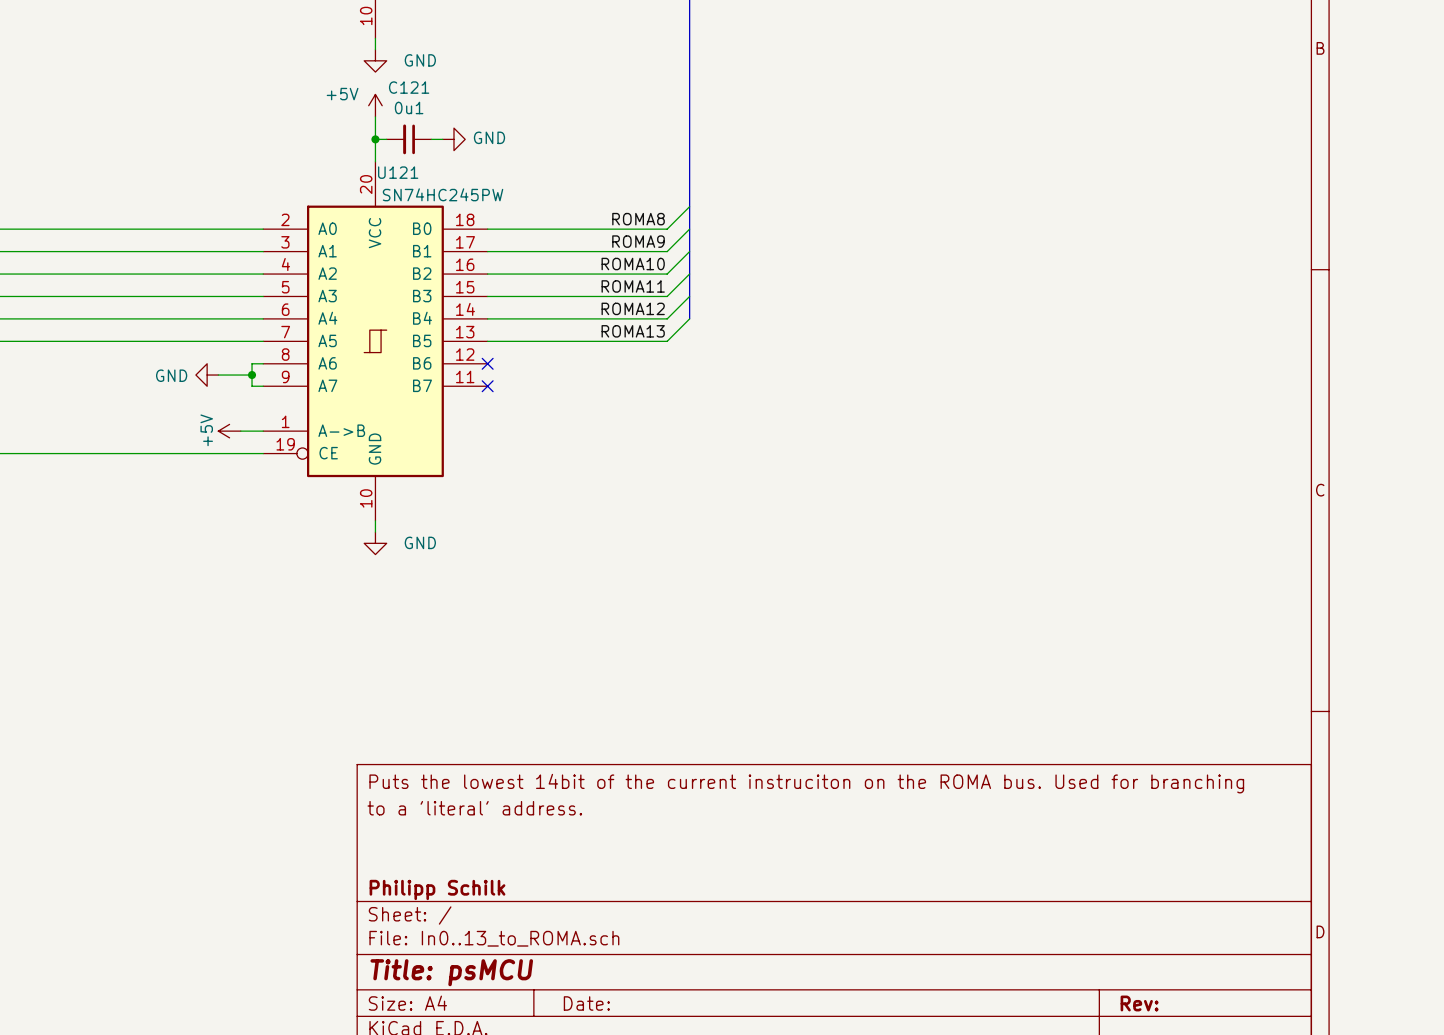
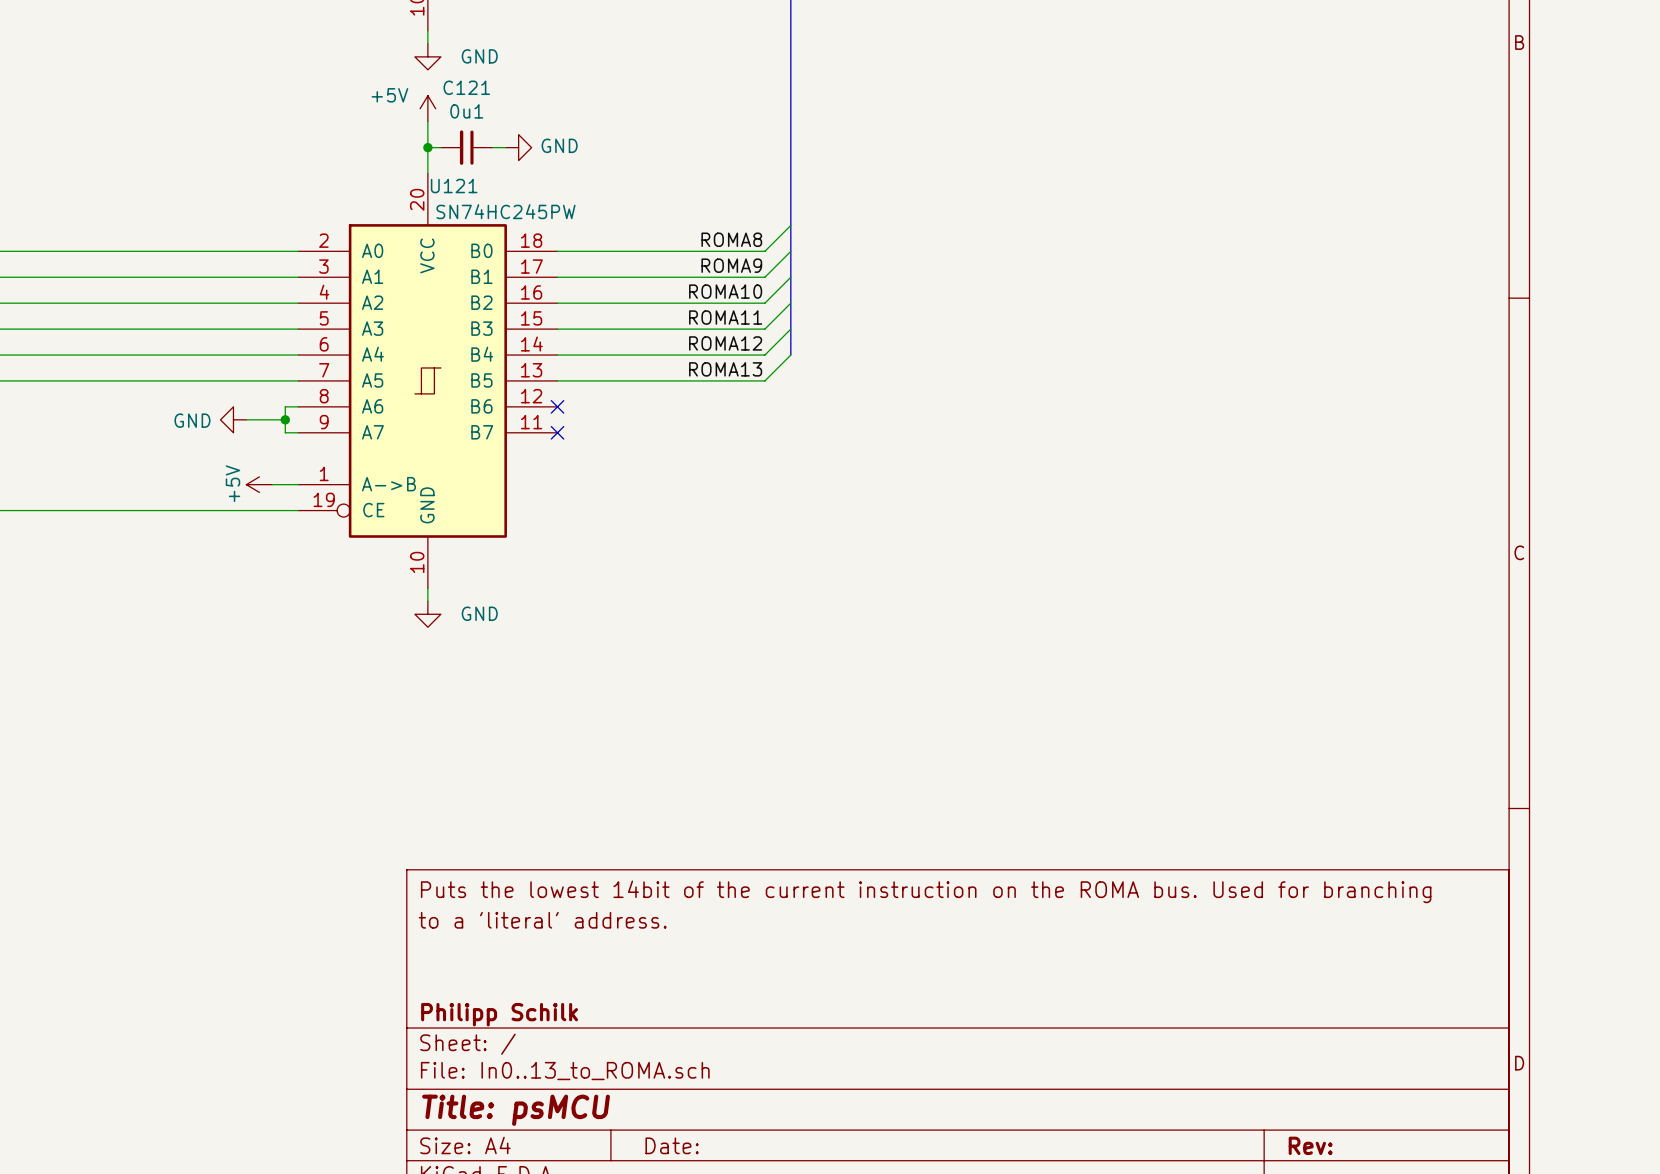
title block: Puts the lowest 14bit of the current instruciton on the ROMA bus. Used for branching (806, 783) -> Puts the lowest 14bit of the current instruction on the ROMA bus. Used for branching (926, 891)

